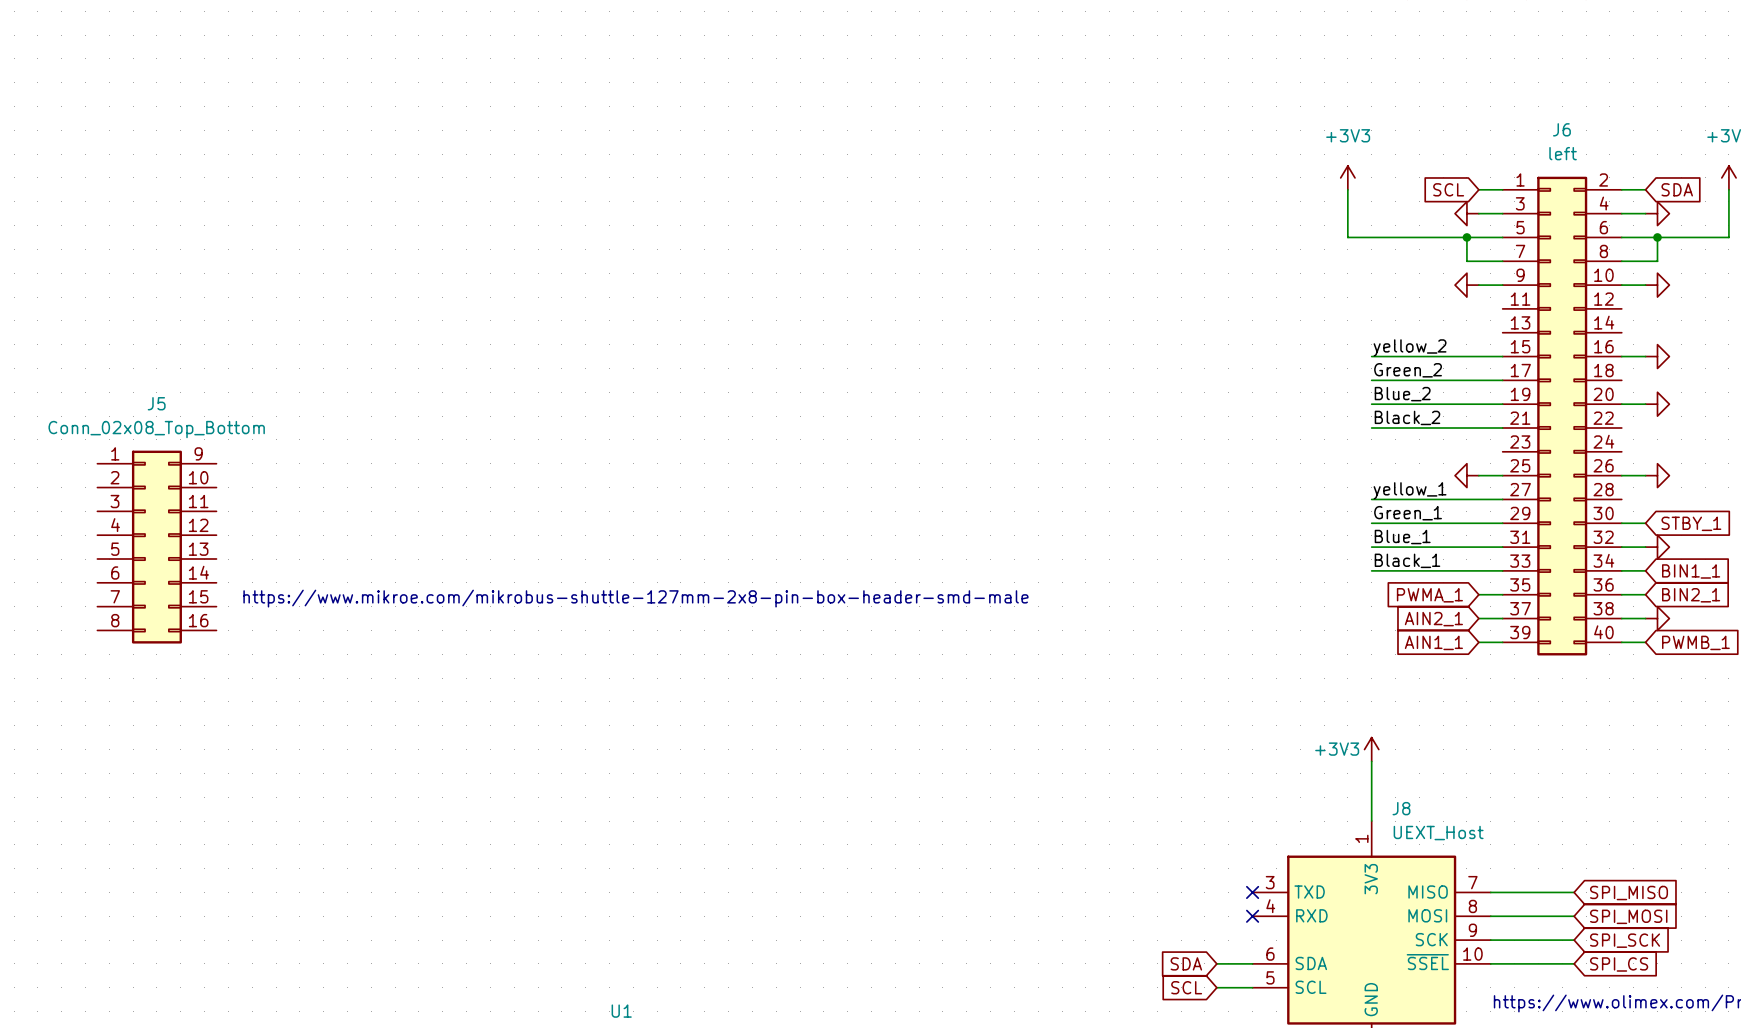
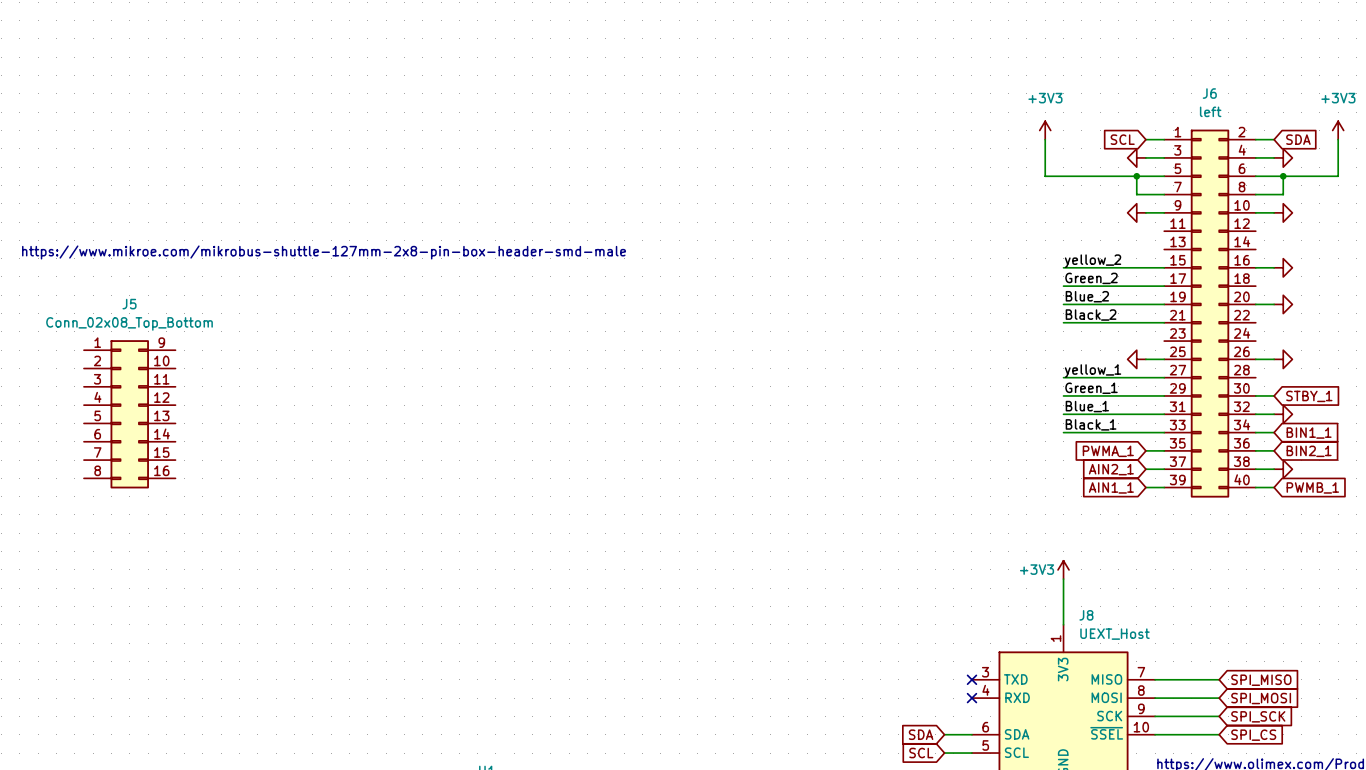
text: none -> https://www.mikroe.com/mikrobus-shuttle-127mm-2x8-pin-box-header-smd-male (324, 252)
text: https://www.mikroe.com/mikrobus-shuttle-127mm-2x8-pin-box-header-smd-male (635, 598) -> none

